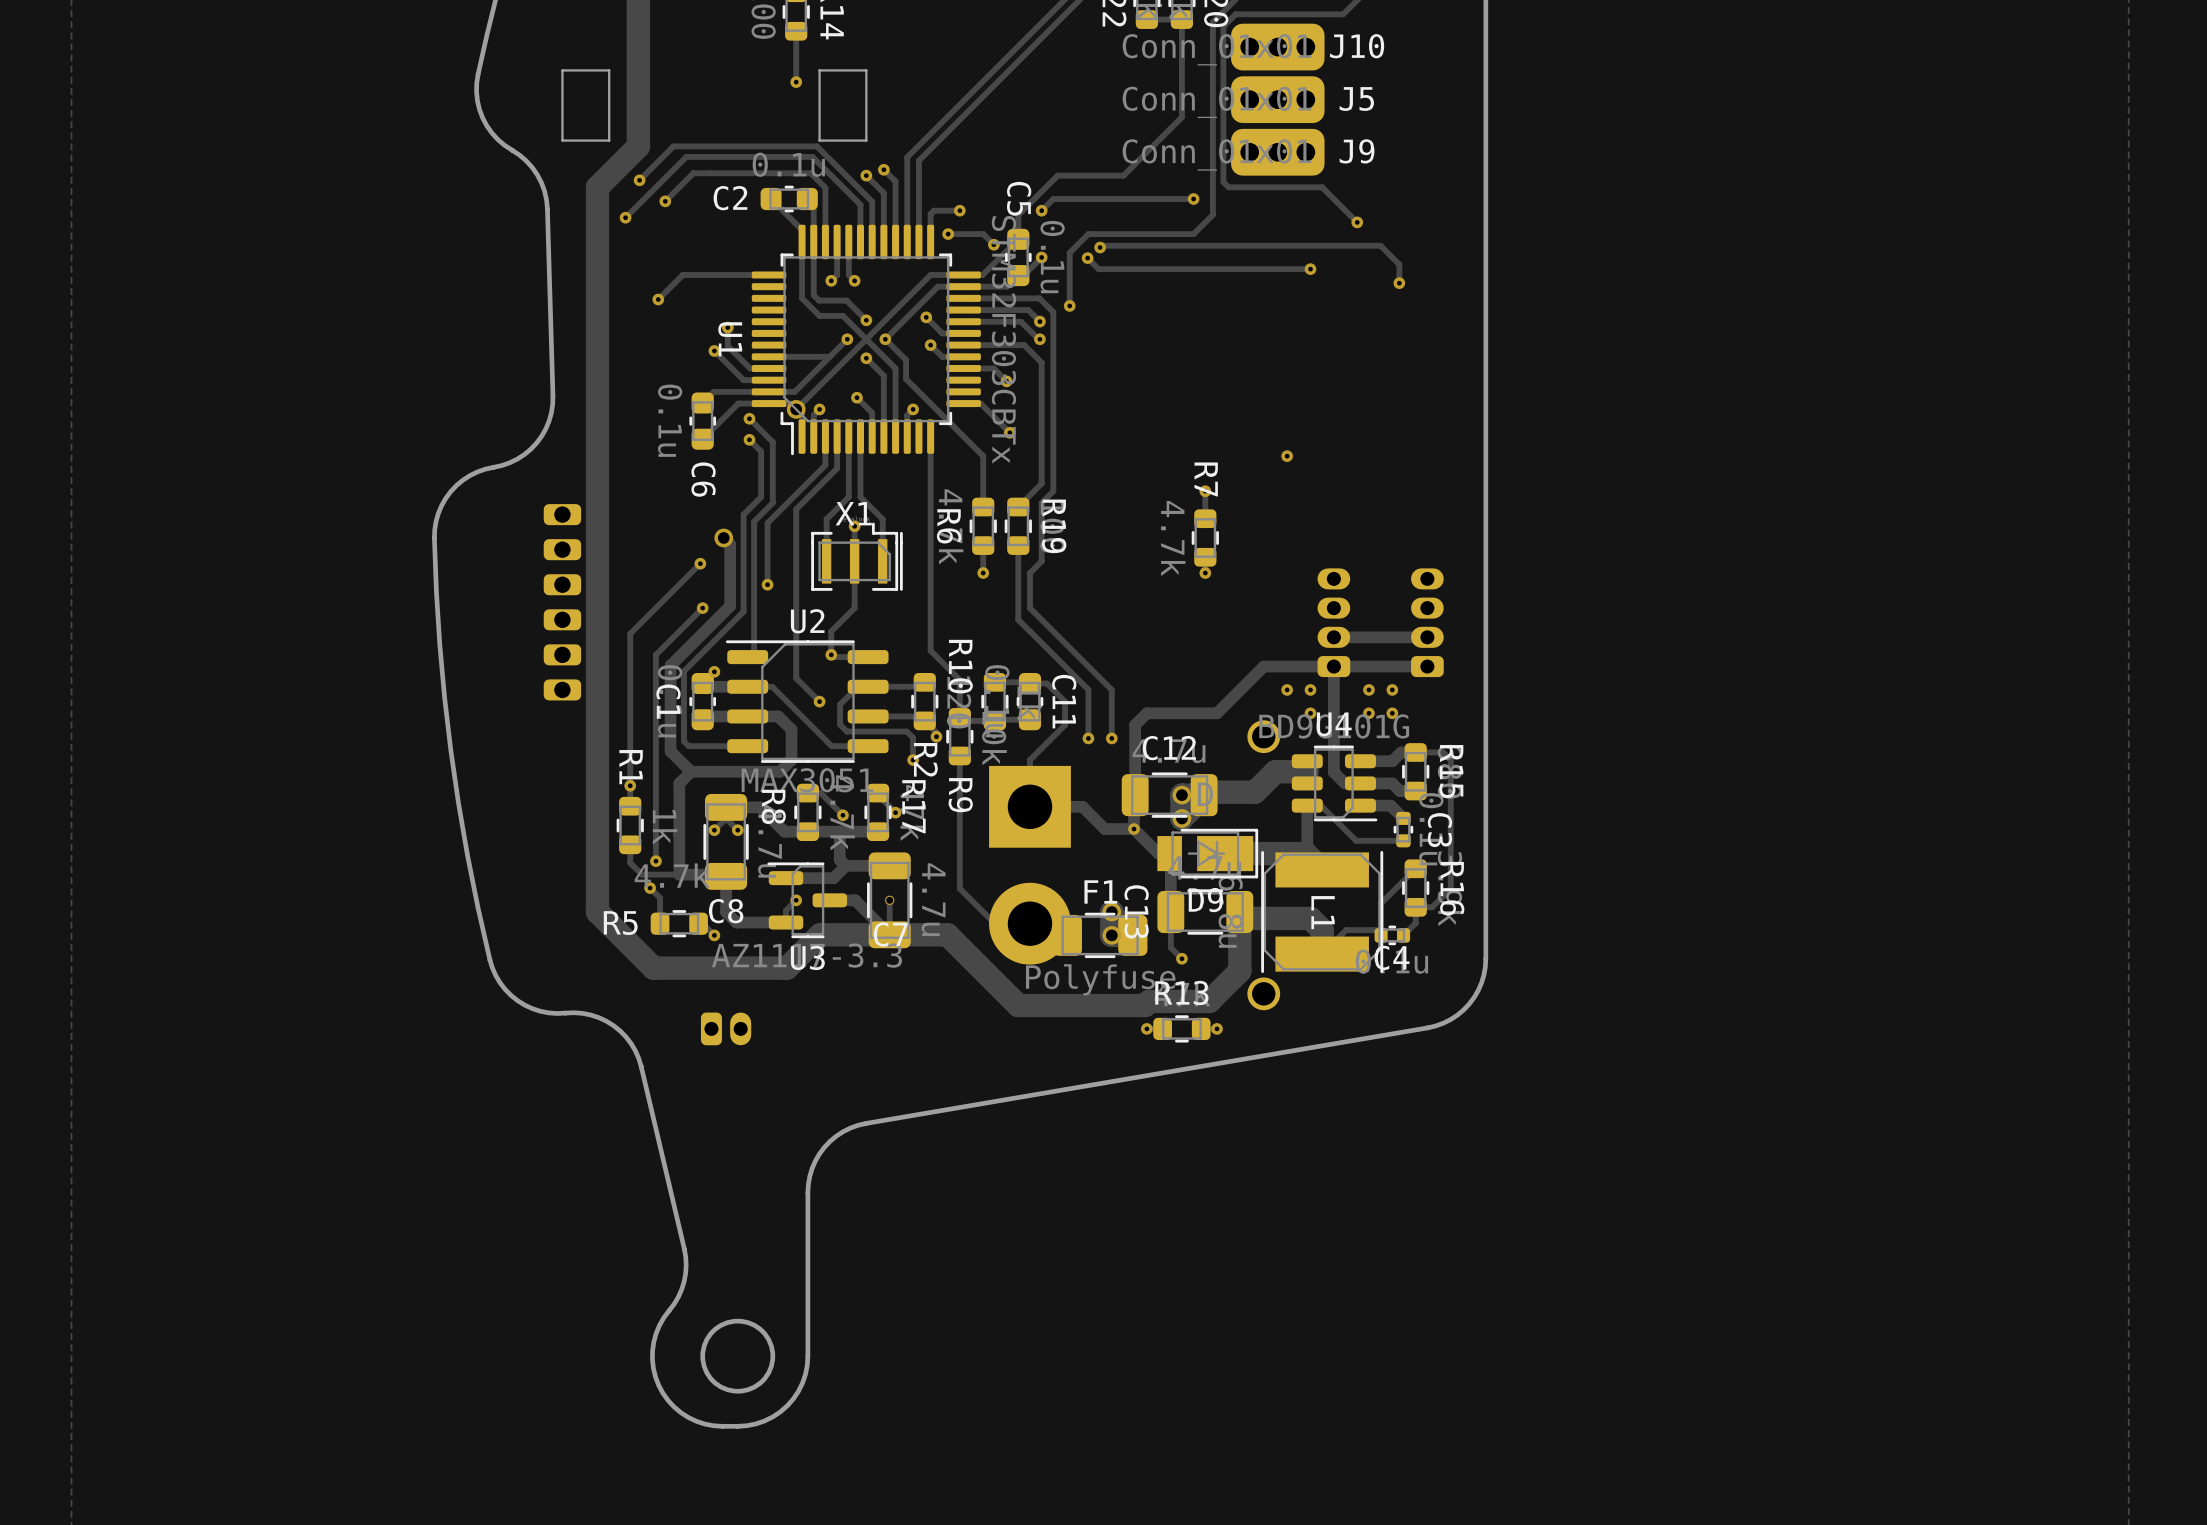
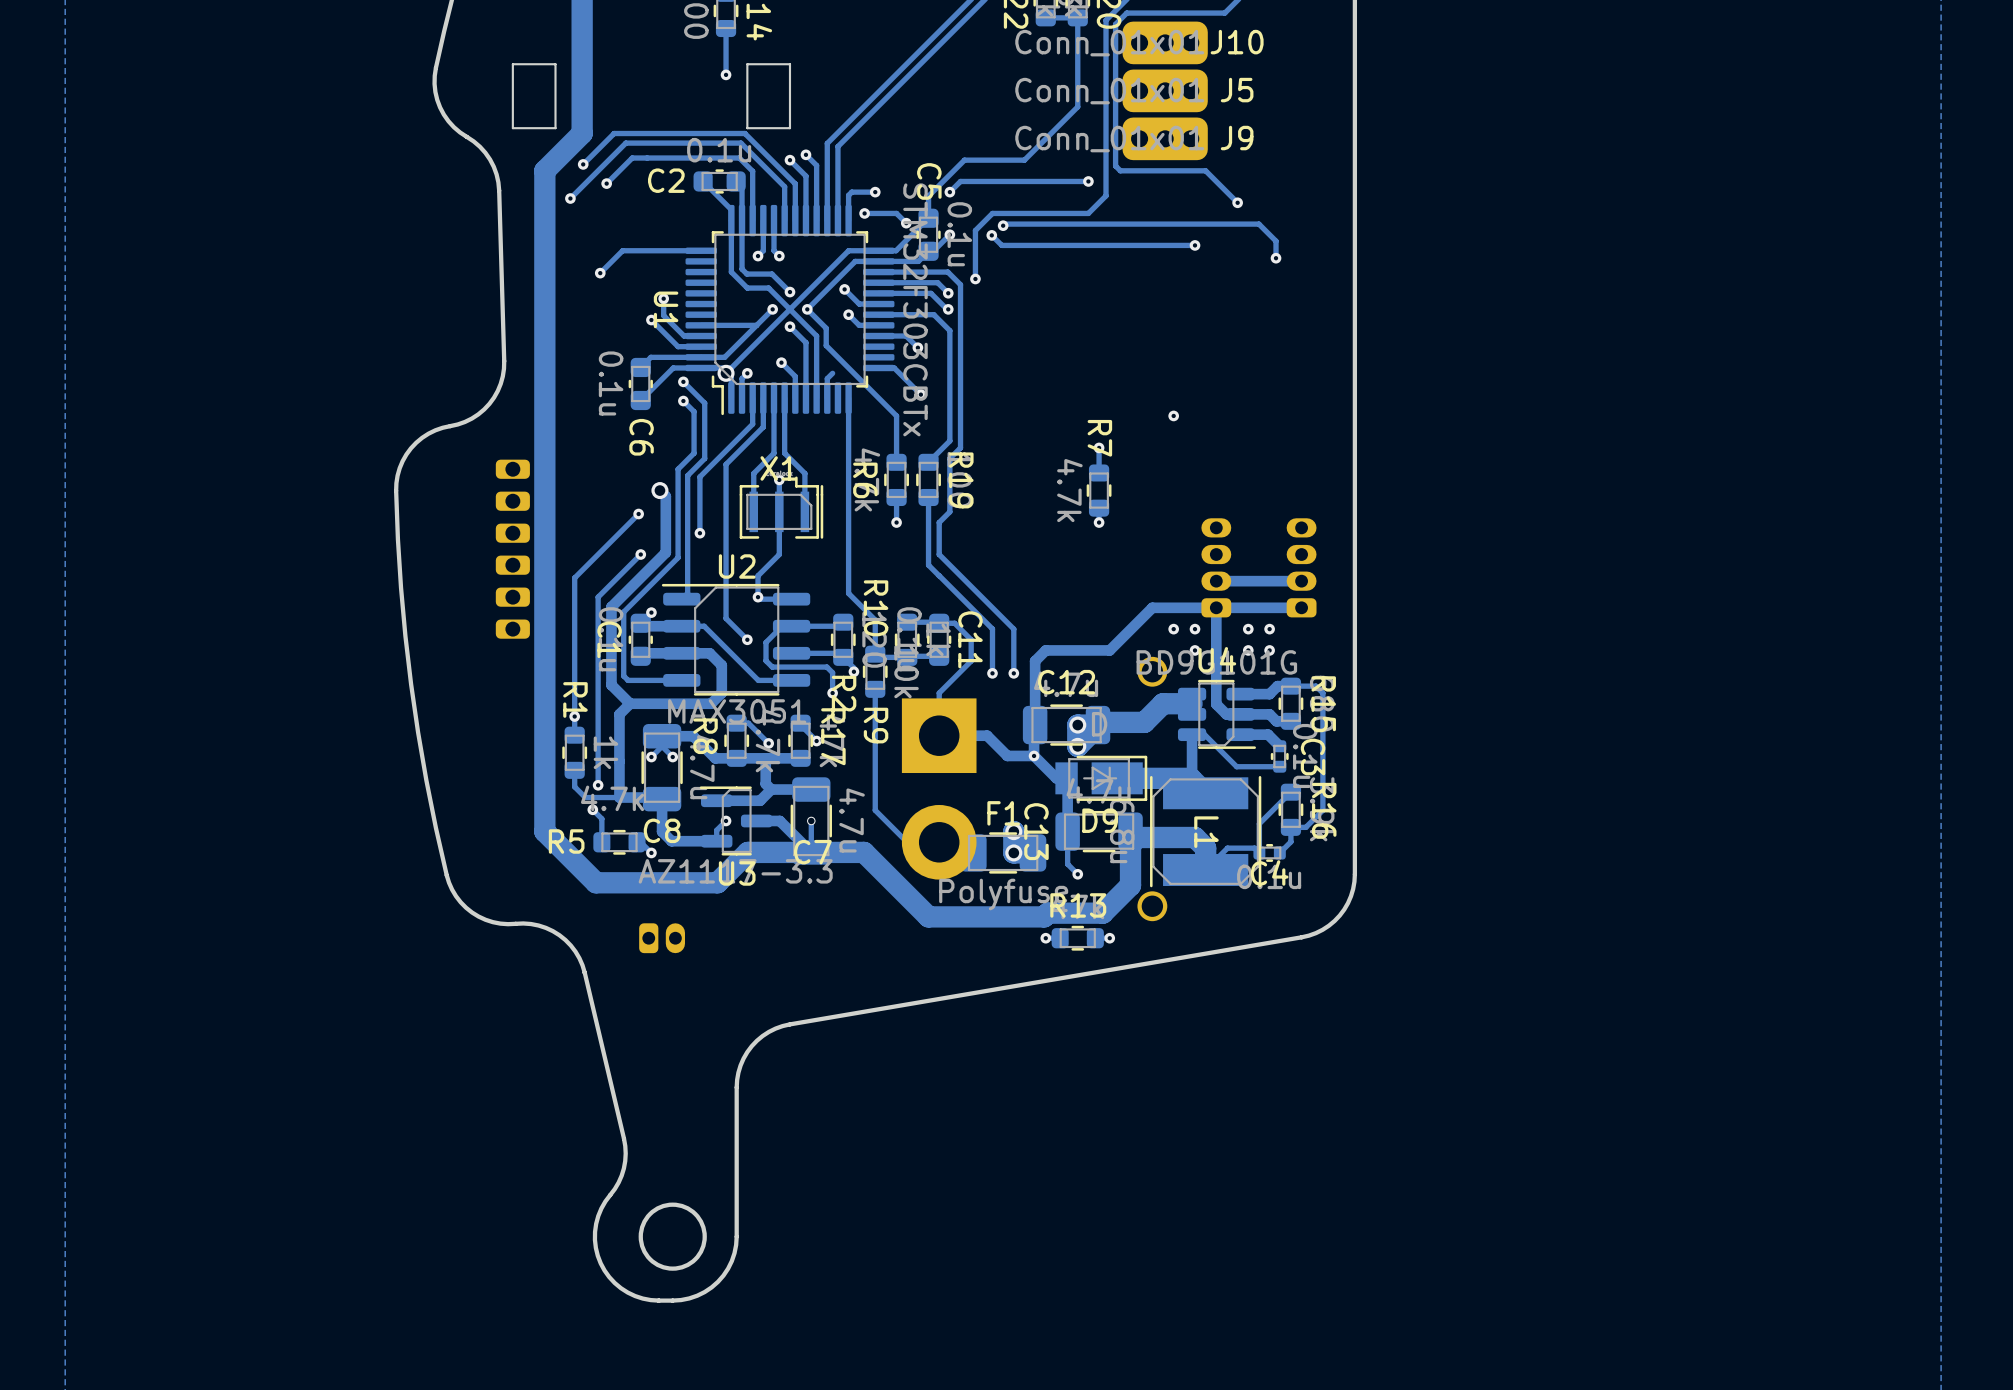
via: (913, 409) -> none

